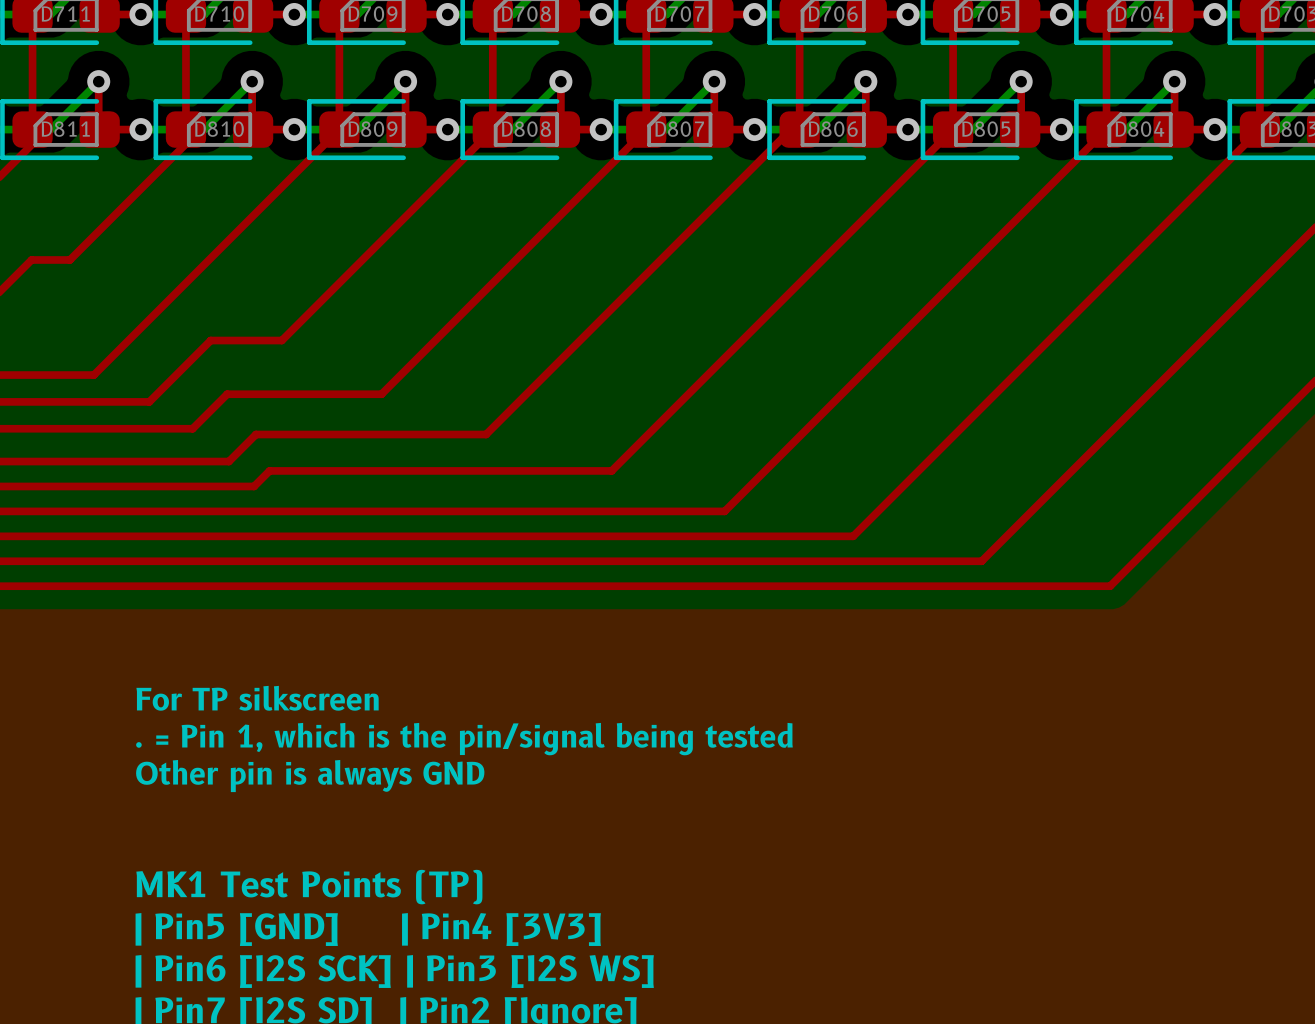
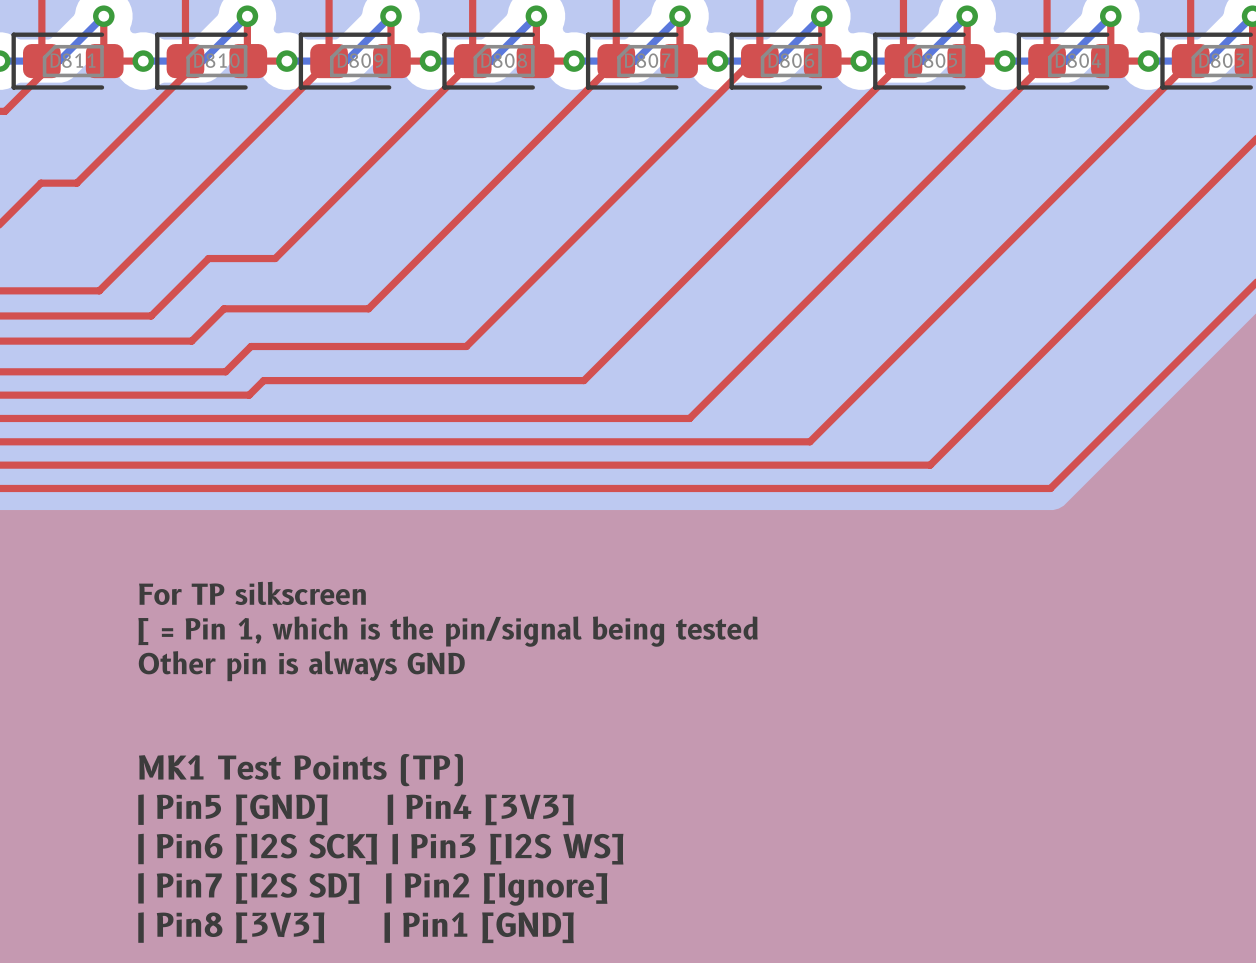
text: . = Pin 1, which is the pin/signal being tested (464, 739) -> [ = Pin 1, which is the pin/signal being tested (448, 631)

